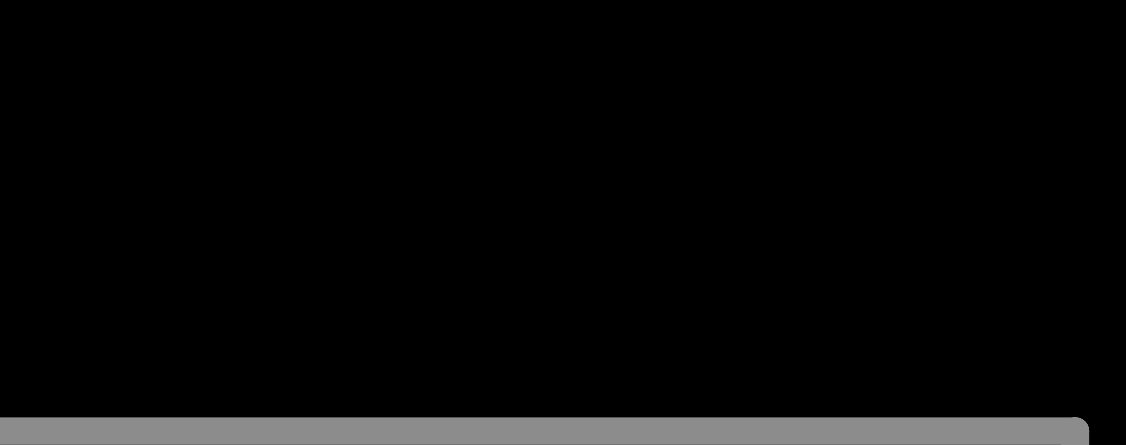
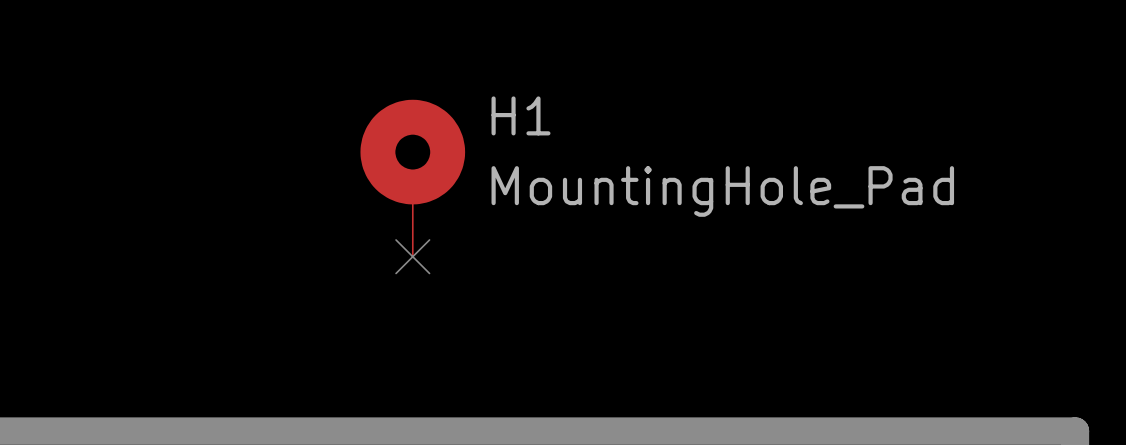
H1: none -> MountingHole_Pad (412, 178)
no-connect mark: none -> (412, 256)

